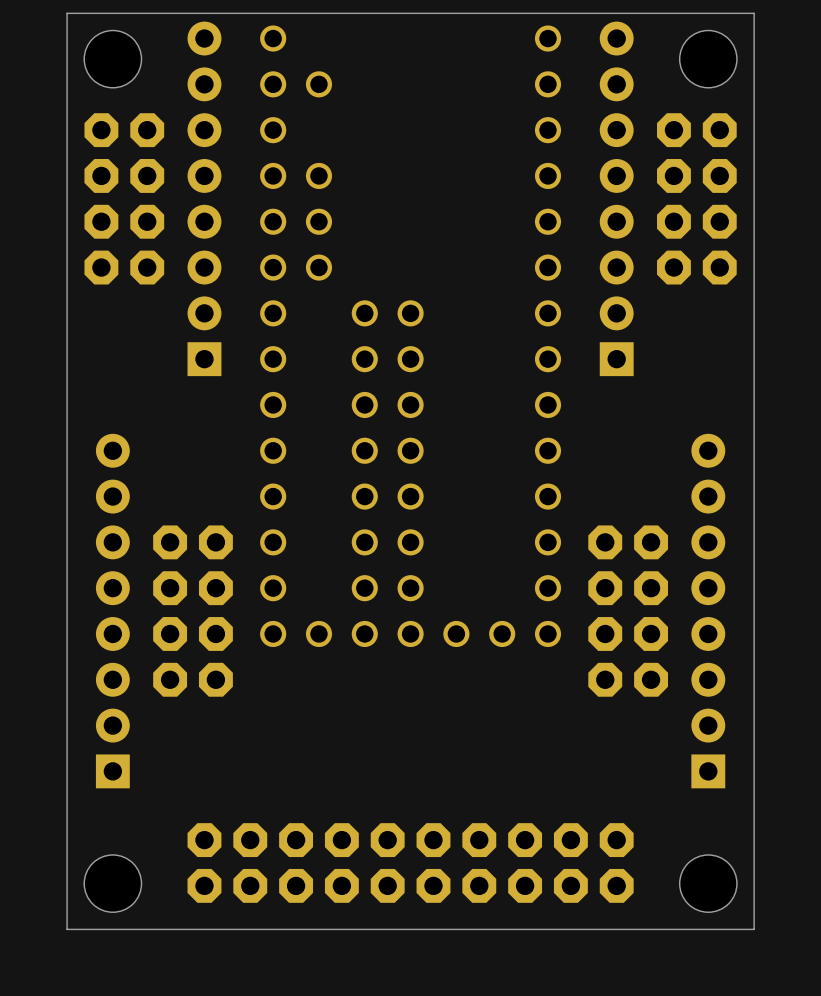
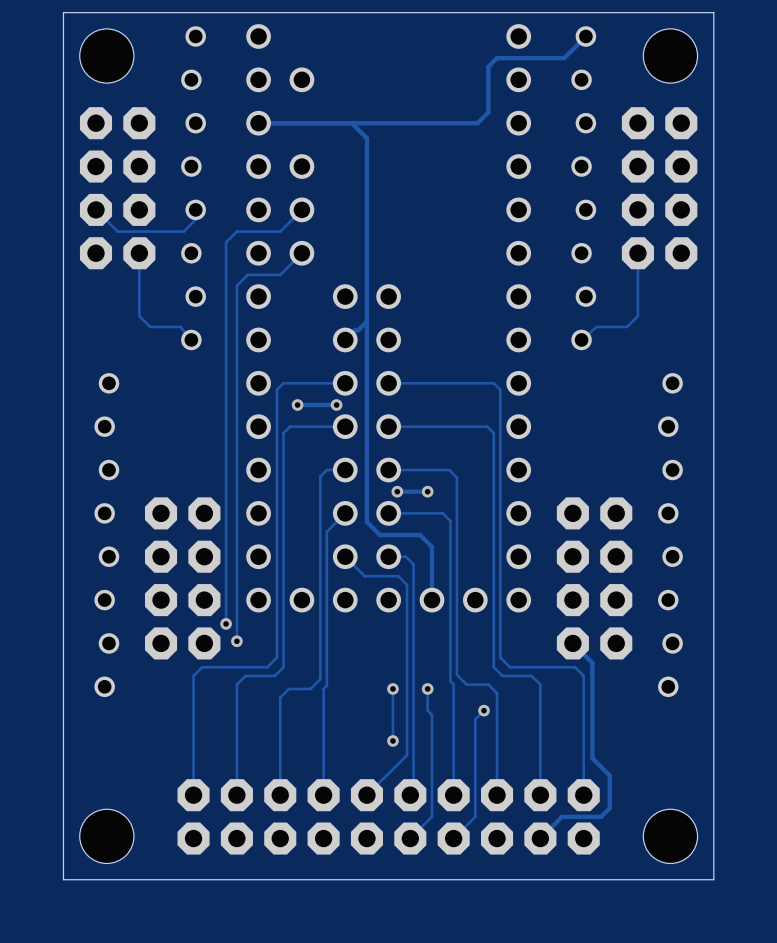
part footprint: [187, 21, 222, 377] -> [181, 26, 206, 351]
part footprint: [599, 21, 634, 377] -> [571, 26, 597, 351]
track: none -> (585, 36) (564, 58) (497, 58) (488, 66) (488, 112) (477, 123) (258, 123)
track: none -> (351, 123) (366, 138) (366, 522) (379, 535) (420, 535) (431, 546) (431, 600)
track: none -> (195, 209) (195, 219) (183, 231) (117, 231) (95, 209)
track: none -> (301, 209) (280, 231) (236, 231) (226, 242) (226, 623)
track: none -> (139, 253) (139, 316) (150, 326) (180, 326) (191, 339)
track: none -> (301, 253) (280, 274) (247, 274) (236, 285) (236, 641)
track: none -> (637, 253) (637, 316) (627, 326) (596, 326) (581, 339)
track: none -> (366, 321) (345, 339)
track: none -> (345, 383) (283, 383) (277, 389) (277, 657) (267, 667) (202, 667) (193, 675) (193, 795)
track: none -> (388, 383) (493, 383) (500, 389) (500, 657) (510, 667) (575, 667) (583, 675) (583, 795)
via: none -> (297, 404)
track: none -> (336, 404) (297, 404)
via: none -> (336, 404)
track: none -> (345, 426) (290, 426) (283, 433) (283, 667) (274, 675) (245, 675) (236, 684) (236, 795)
track: none -> (388, 426) (487, 426) (493, 433) (493, 667) (502, 675) (531, 675) (540, 684) (540, 795)
track: none -> (345, 470) (326, 470) (320, 476) (320, 679) (310, 688) (288, 688) (280, 697) (280, 795)
track: none -> (388, 470) (449, 470) (456, 477) (456, 674) (466, 684) (488, 684) (497, 693) (497, 795)
via: none -> (397, 491)
track: none -> (427, 491) (397, 491)
via: none -> (427, 491)
track: none -> (345, 513) (326, 531) (326, 685) (323, 688) (323, 795)
track: none -> (388, 513) (442, 513) (450, 520) (450, 681) (453, 684) (453, 795)
part: none -> (106, 535)
part: none -> (670, 535)
track: none -> (345, 556) (364, 576) (398, 576) (407, 584) (407, 755) (366, 795)
track: none -> (388, 556) (405, 556) (413, 564) (413, 791) (410, 795)
part: (112, 611) -> none
part: (708, 611) -> none
via: none -> (226, 623)
via: none -> (236, 641)
track: none -> (572, 643) (592, 662) (592, 758) (609, 775) (609, 808) (601, 816) (562, 816) (540, 838)
track: none -> (392, 688) (392, 740)
via: none -> (392, 688)
track: none -> (427, 688) (427, 710) (431, 714) (431, 816) (410, 838)
via: none -> (427, 688)
track: none -> (484, 710) (475, 719) (475, 816) (453, 838)
via: none -> (484, 710)
via: none -> (392, 740)

